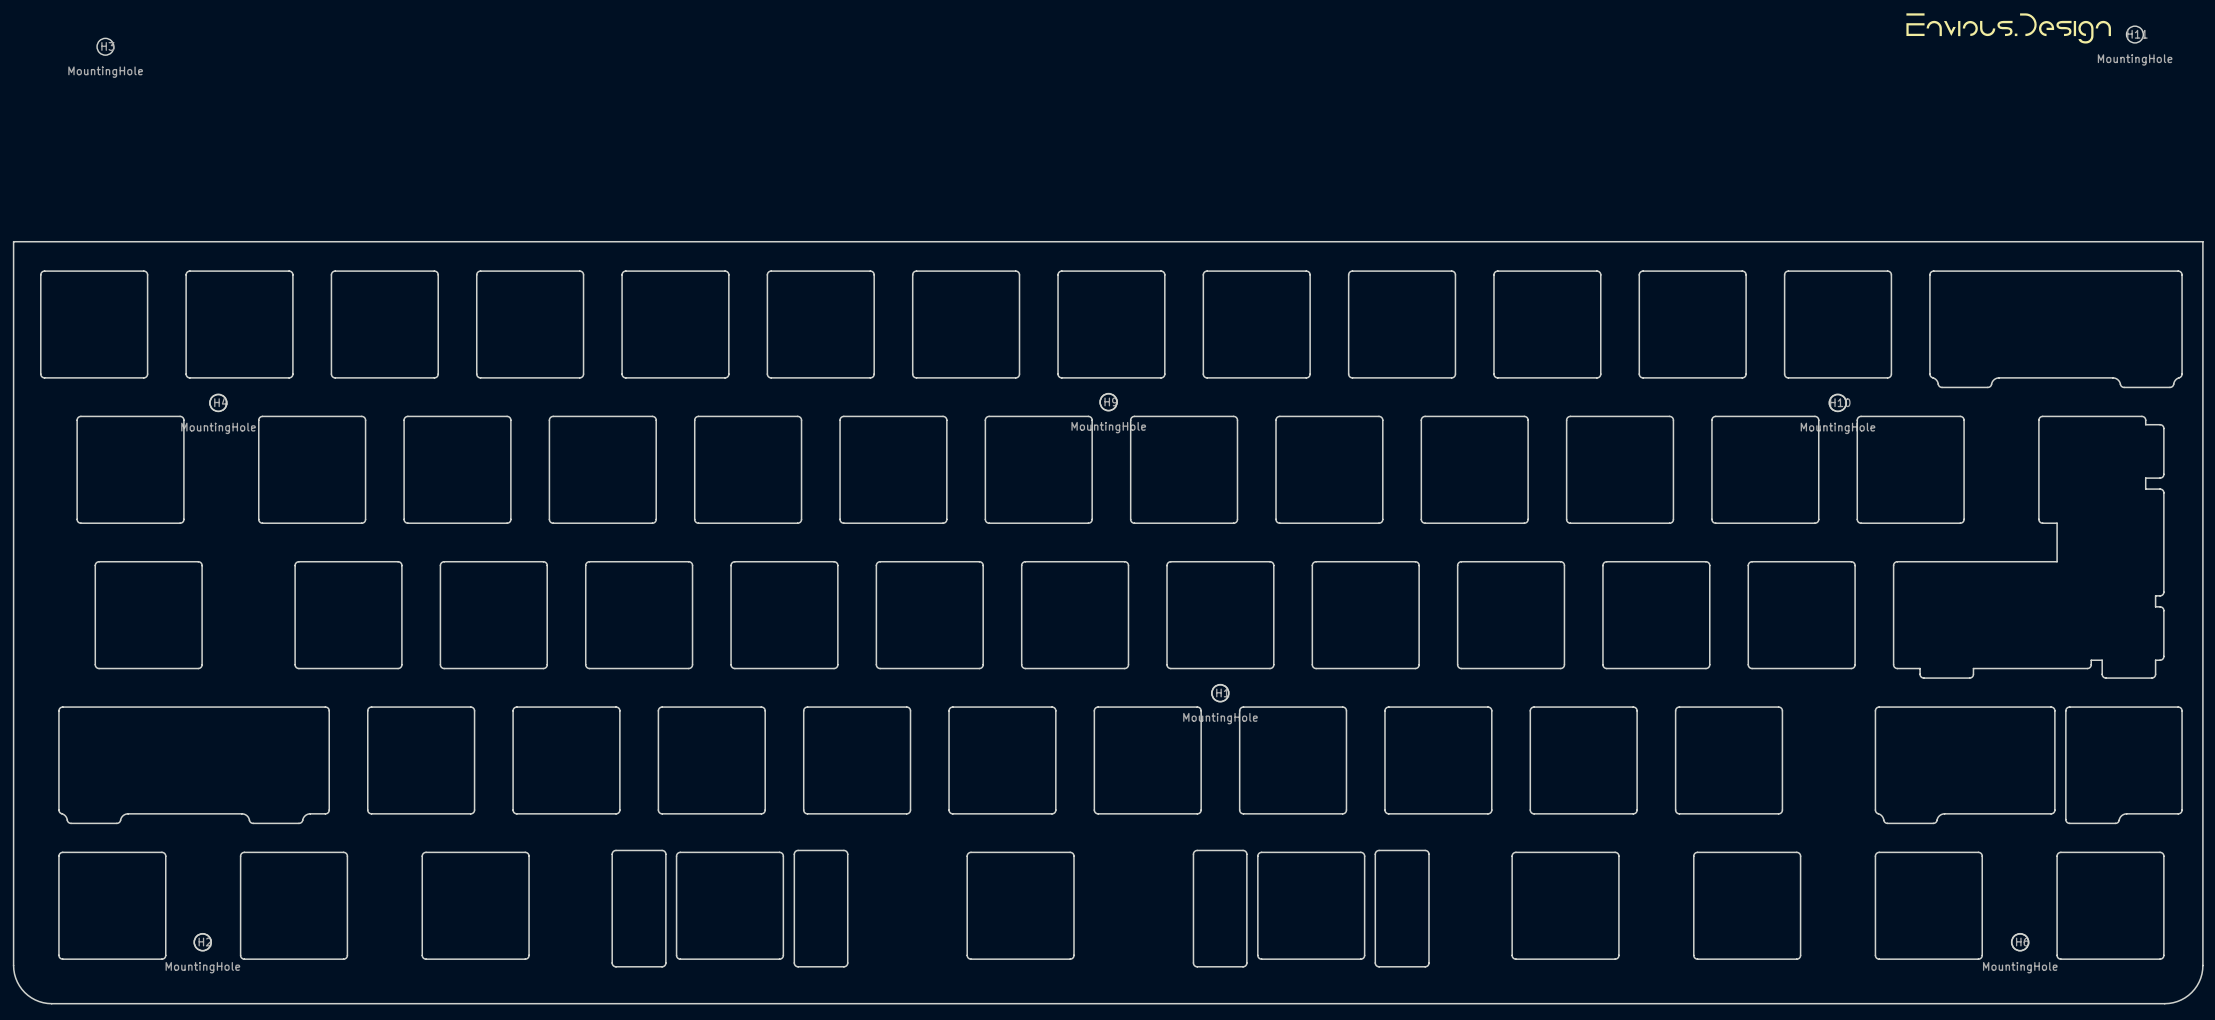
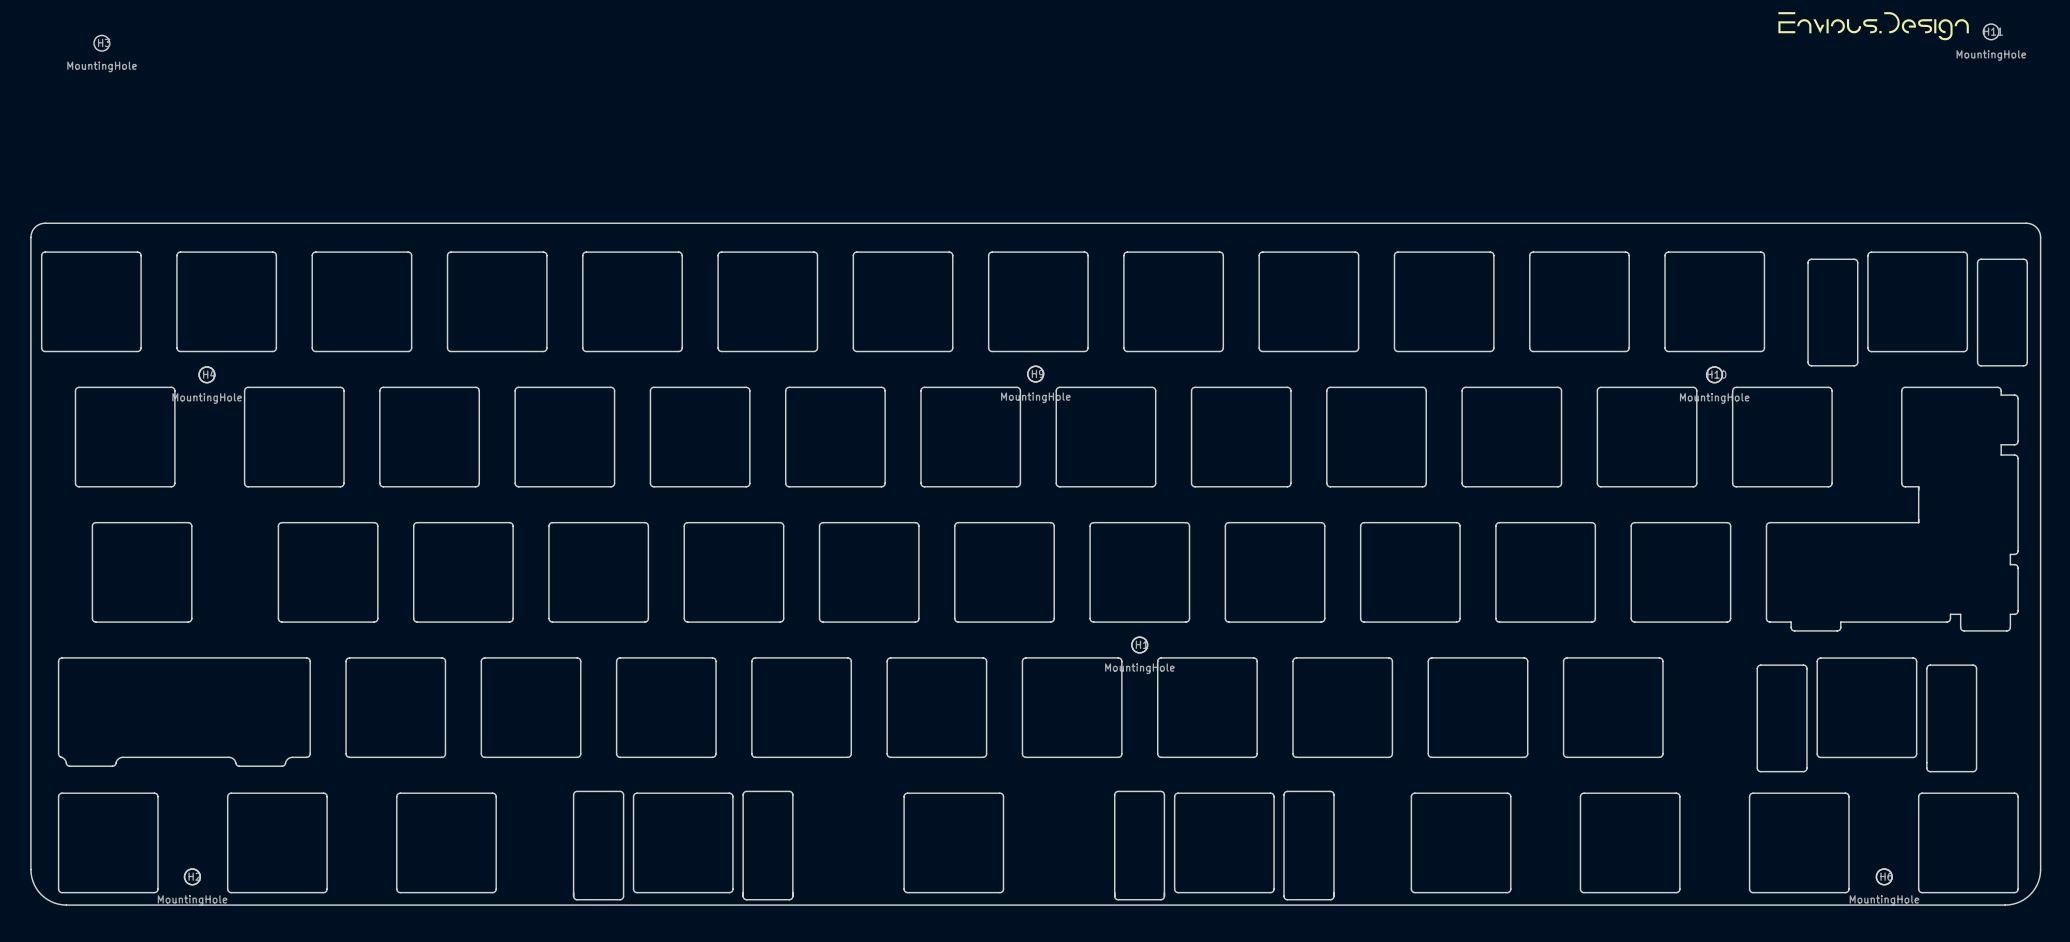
board edge: (13, 241) (2202, 241) (2202, 965) (2200, 978) (2188, 995) (2177, 1001) (2164, 1003) (51, 1003) (39, 1001) (21, 989) (15, 978) (13, 965) (13, 241) -> (45, 223) (35, 227) (30, 237) (30, 869) (36, 888) (44, 897) (54, 903) (66, 905) (2005, 905) (2016, 903) (2027, 897) (2038, 881) (2040, 869) (2040, 237) (2037, 228) (2031, 224) (45, 223)
board edge: (1933, 271) (2179, 271) (2182, 274) (2181, 375) (2169, 387) (2123, 387) (2117, 379) (2112, 377) (1999, 377) (1994, 379) (1988, 387) (1940, 387) (1929, 374) (1929, 274) (1933, 271) -> none
board edge: none -> (1871, 252) (1966, 253) (1966, 350) (1868, 350) (1867, 255) (1871, 252)
board edge: none -> (1811, 259) (1854, 259) (1857, 261) (1857, 362) (1855, 365) (1811, 365) (1808, 363) (1808, 262) (1811, 259)
board edge: none -> (1981, 259) (2023, 259) (2027, 261) (2027, 362) (2025, 365) (1981, 365) (1977, 363) (1977, 262) (1981, 259)
board edge: (2054, 710) (2051, 707) (1879, 707) (1875, 710) (1875, 810) (1885, 822) (1933, 823) (1939, 816) (1943, 813) (2051, 813) (2054, 810) -> (1916, 661) (1913, 658) (1820, 658) (1817, 661) (1818, 756) (1913, 757) (1916, 753)
board edge: none -> (1760, 665) (1803, 665) (1806, 667) (1807, 768) (1804, 771) (1760, 771) (1757, 769) (1757, 668) (1760, 665)
board edge: (2065, 718) (2065, 709) (2069, 707) (2178, 707) (2182, 710) (2180, 812) (2125, 813) (2121, 816) (2115, 823) (2069, 823) (2065, 819) -> (1926, 668) (1930, 665) (1973, 665) (1976, 666) (1976, 768) (1973, 771) (1929, 771) (1927, 769) (1926, 762)

